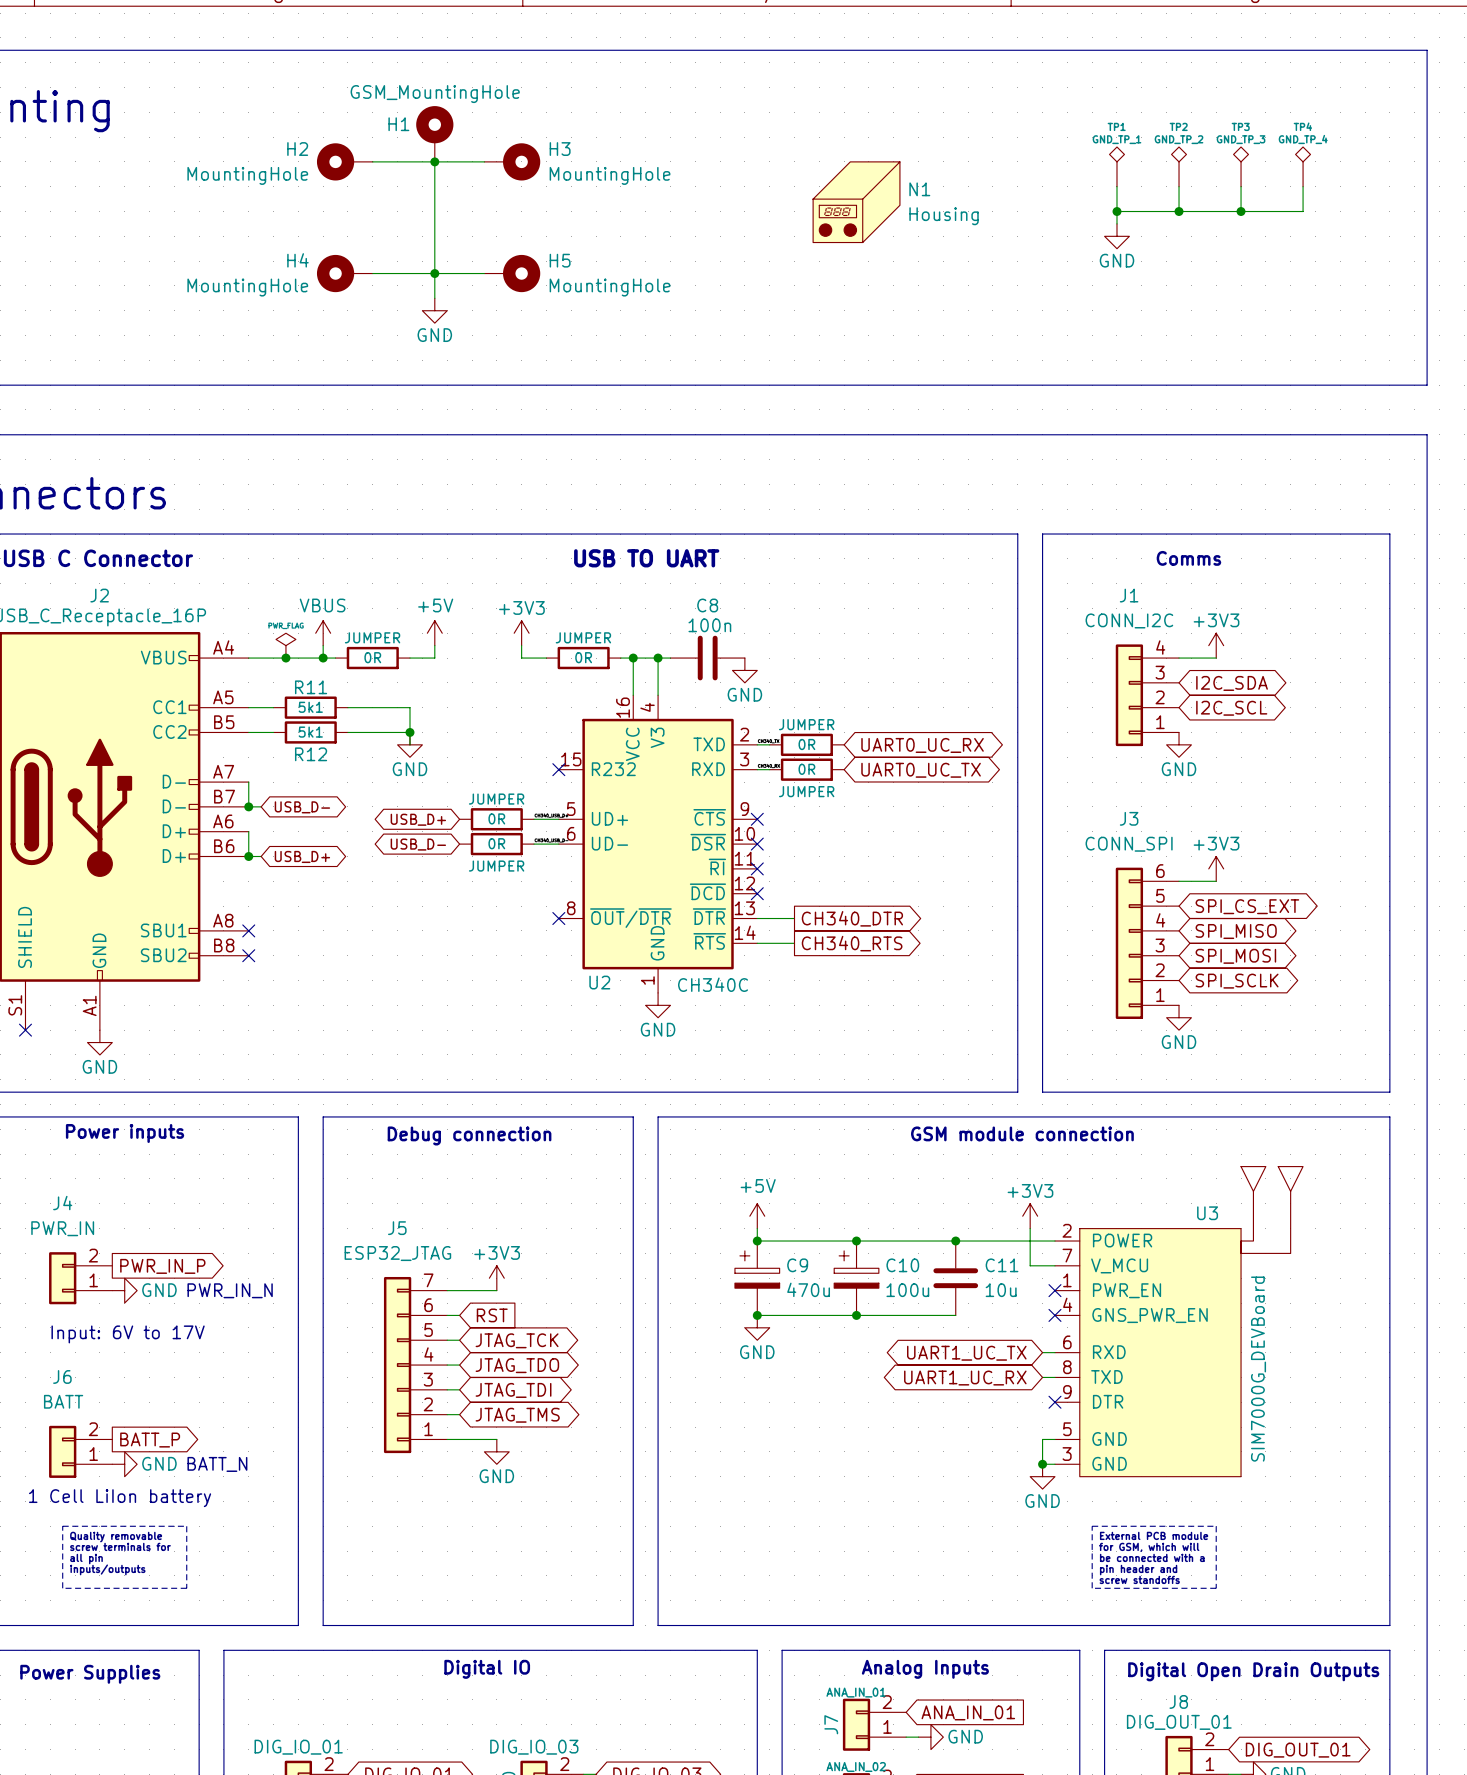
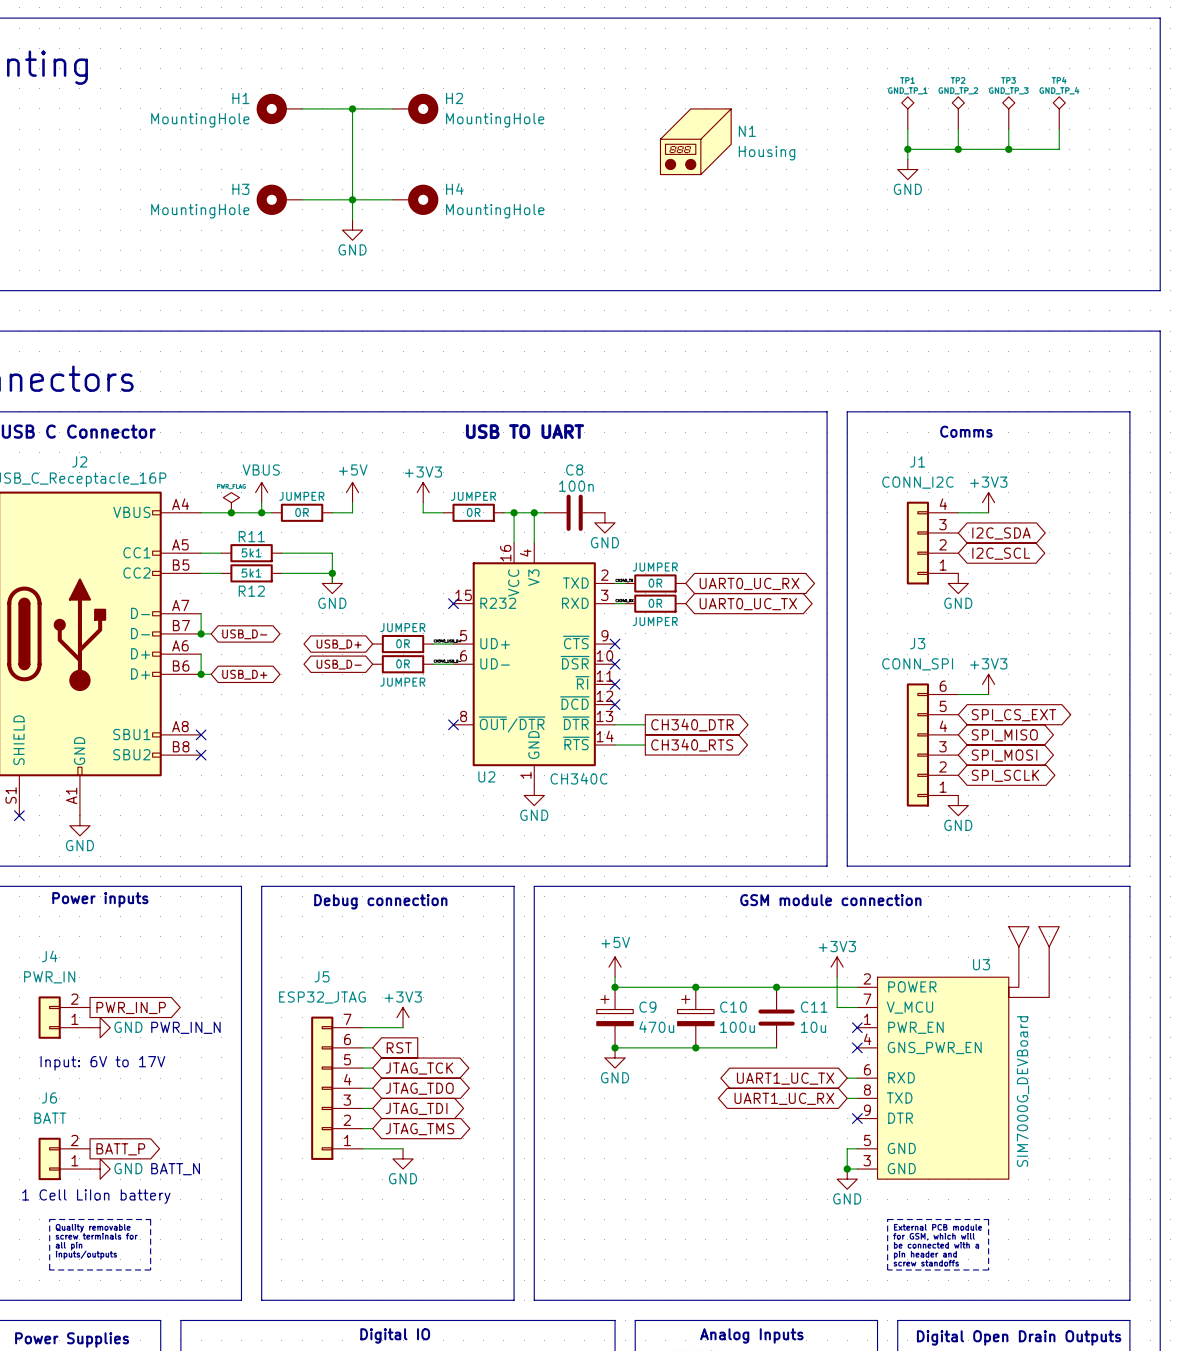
H1: GSM_MountingHole (434, 133) -> none
H2 name: H2 (297, 149) -> H1 (240, 98)
H3 name: H3 (560, 149) -> H2 (454, 98)
H4 name: H4 (297, 260) -> H3 (240, 189)
H5 name: H5 (560, 260) -> H4 (454, 189)

